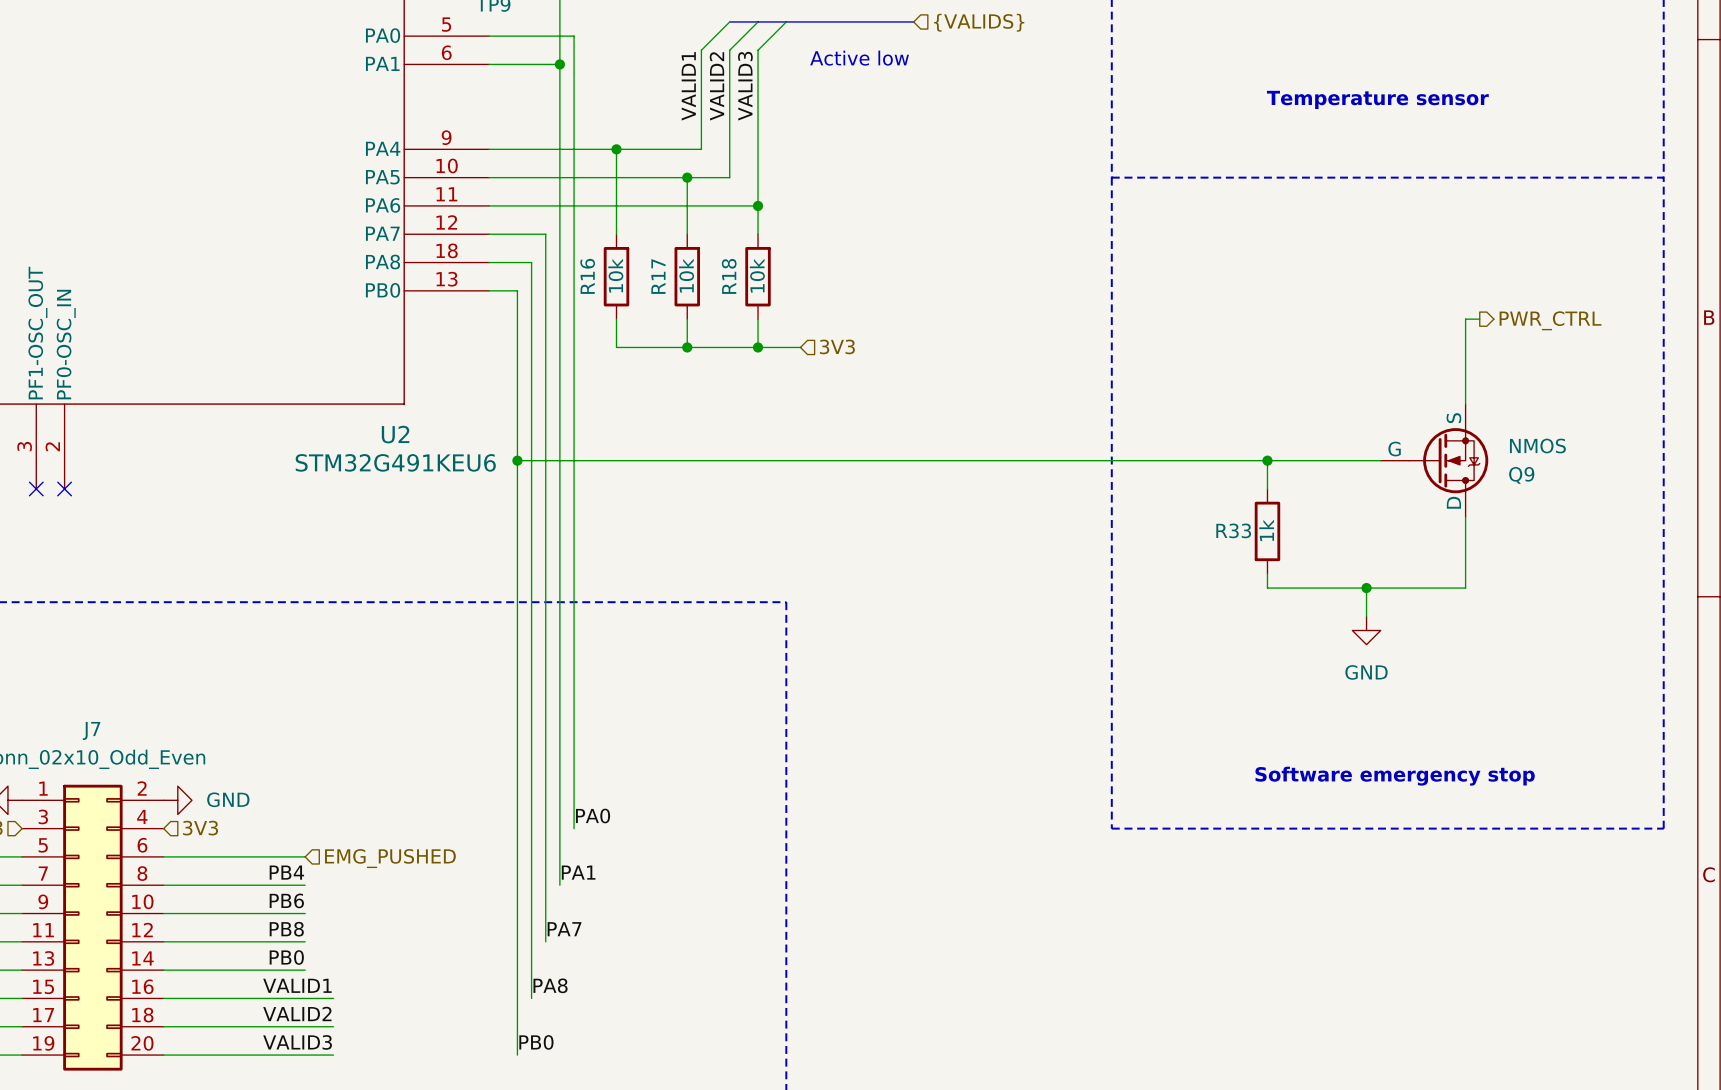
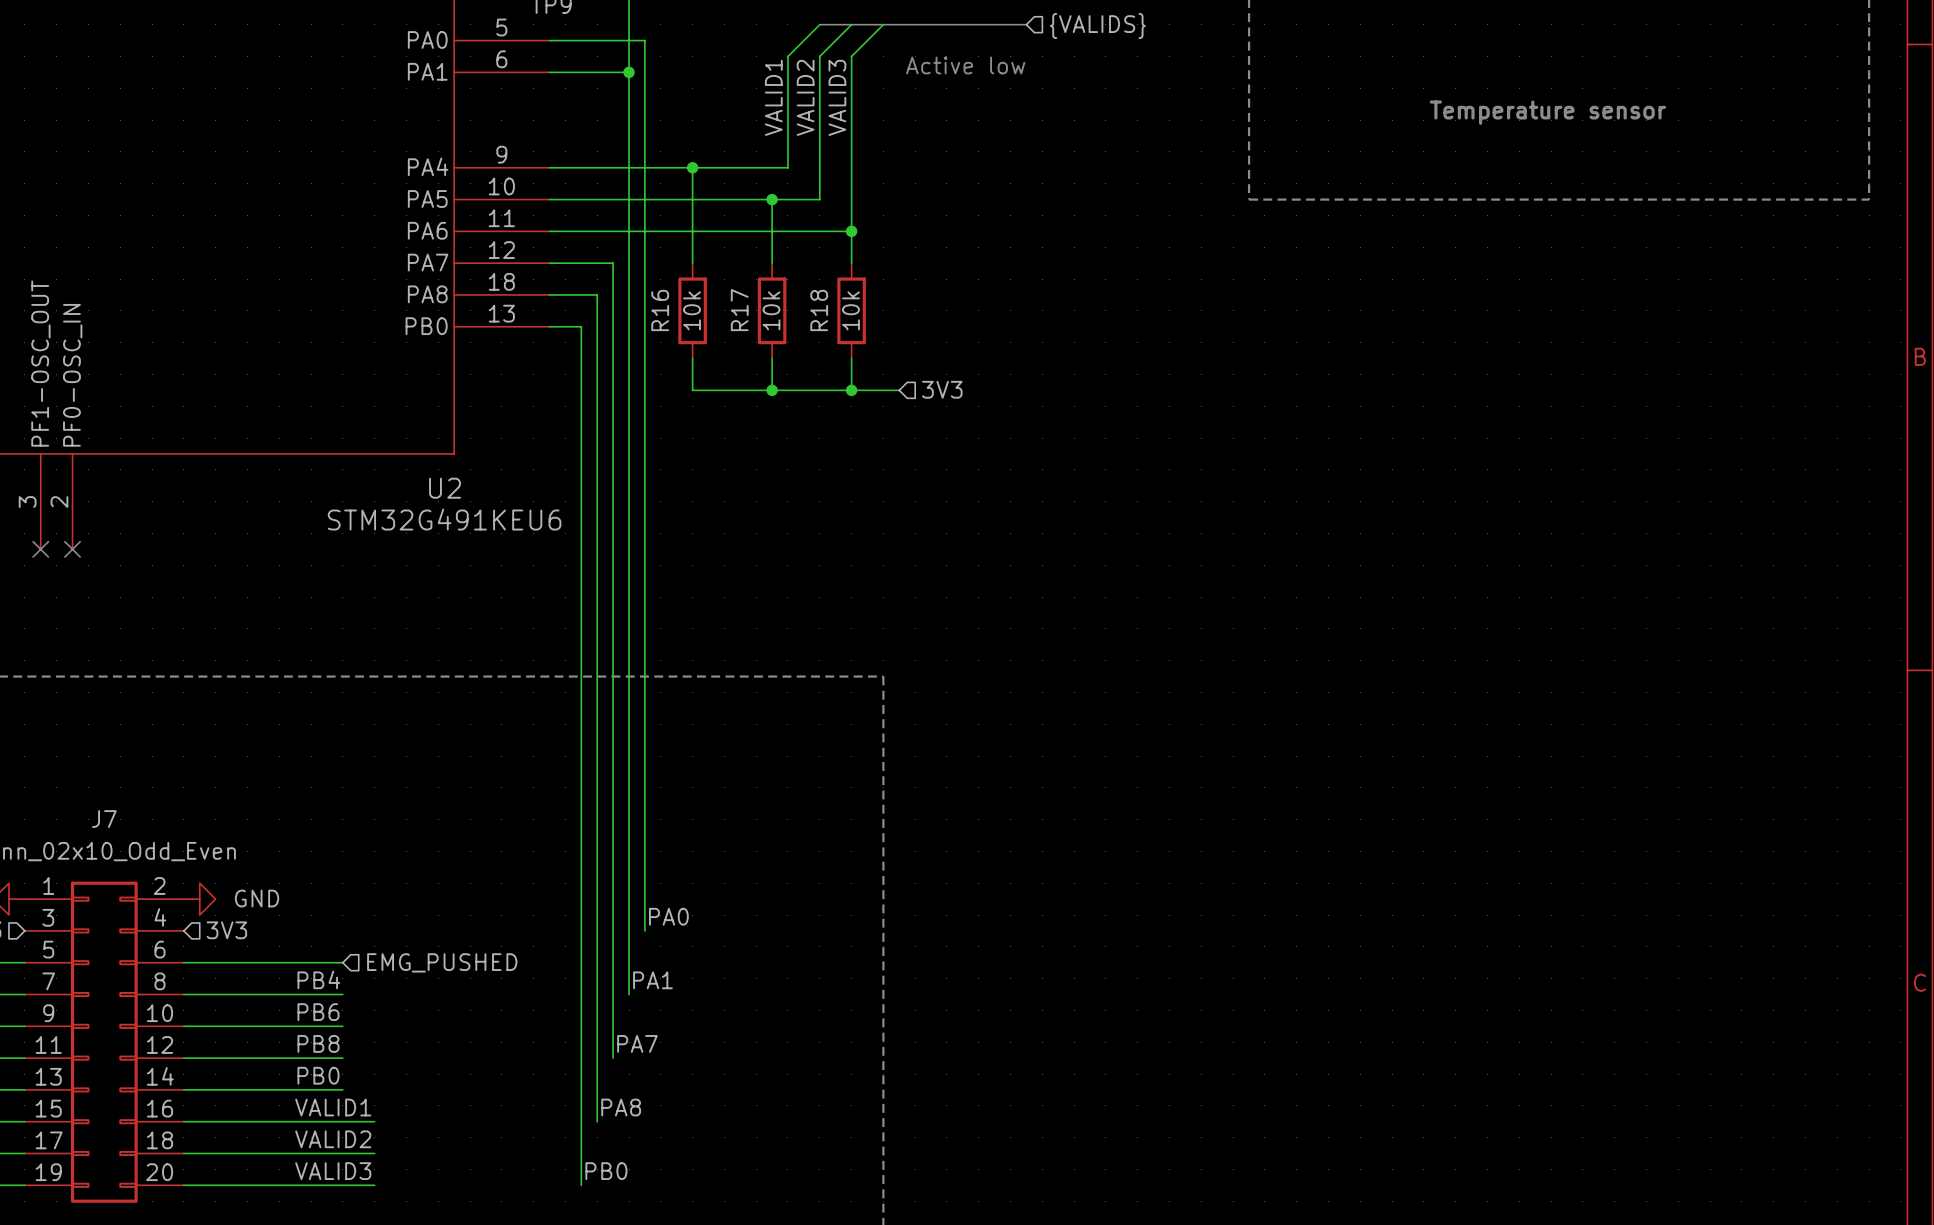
line: (1111, 177) (1111, 828) (1663, 828) (1663, 177) -> none
wire: (1479, 319) (1465, 319) (1465, 404) -> none
hierarchical label: PWR_CTRL (1550, 320) -> none
wire: (517, 460) (1380, 460) -> none
junction: (517, 460) -> none
wire: (1267, 460) (1267, 488) -> none
junction: (1267, 460) -> none
Q9: NMOS (1434, 460) -> none
wire: (1465, 517) (1465, 588) (1267, 588) (1267, 573) -> none
R33: 1k (1267, 531) -> none
wire: (1366, 588) (1366, 616) -> none
junction: (1366, 588) -> none
power symbol: GND (1366, 630) -> none
text: Software emergency stop (1395, 776) -> none

